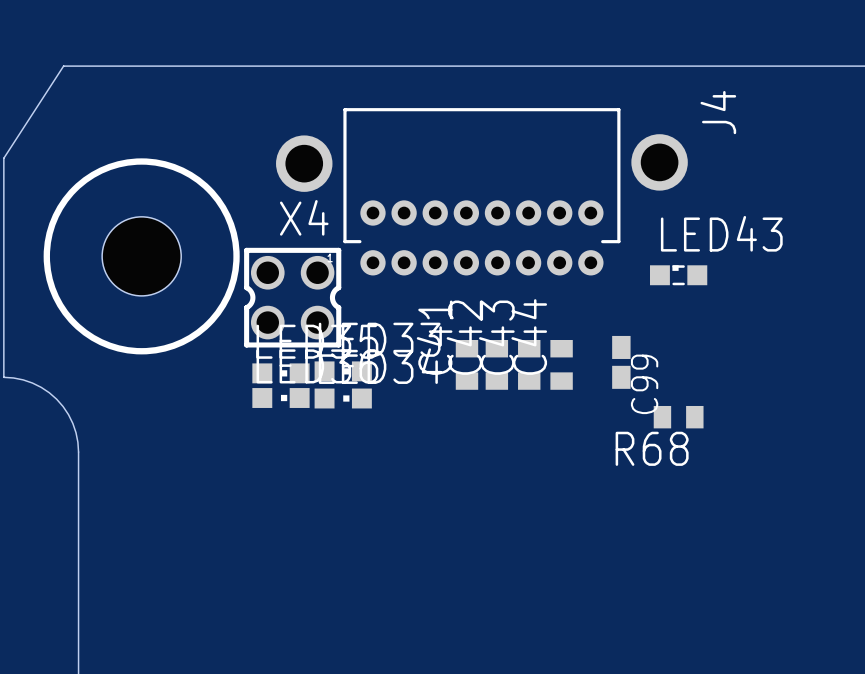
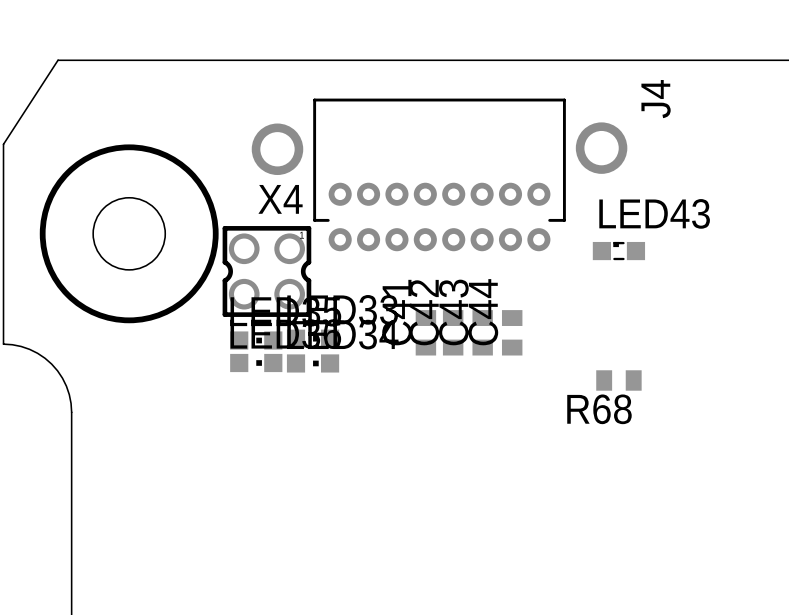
C99: (621, 362) -> none

